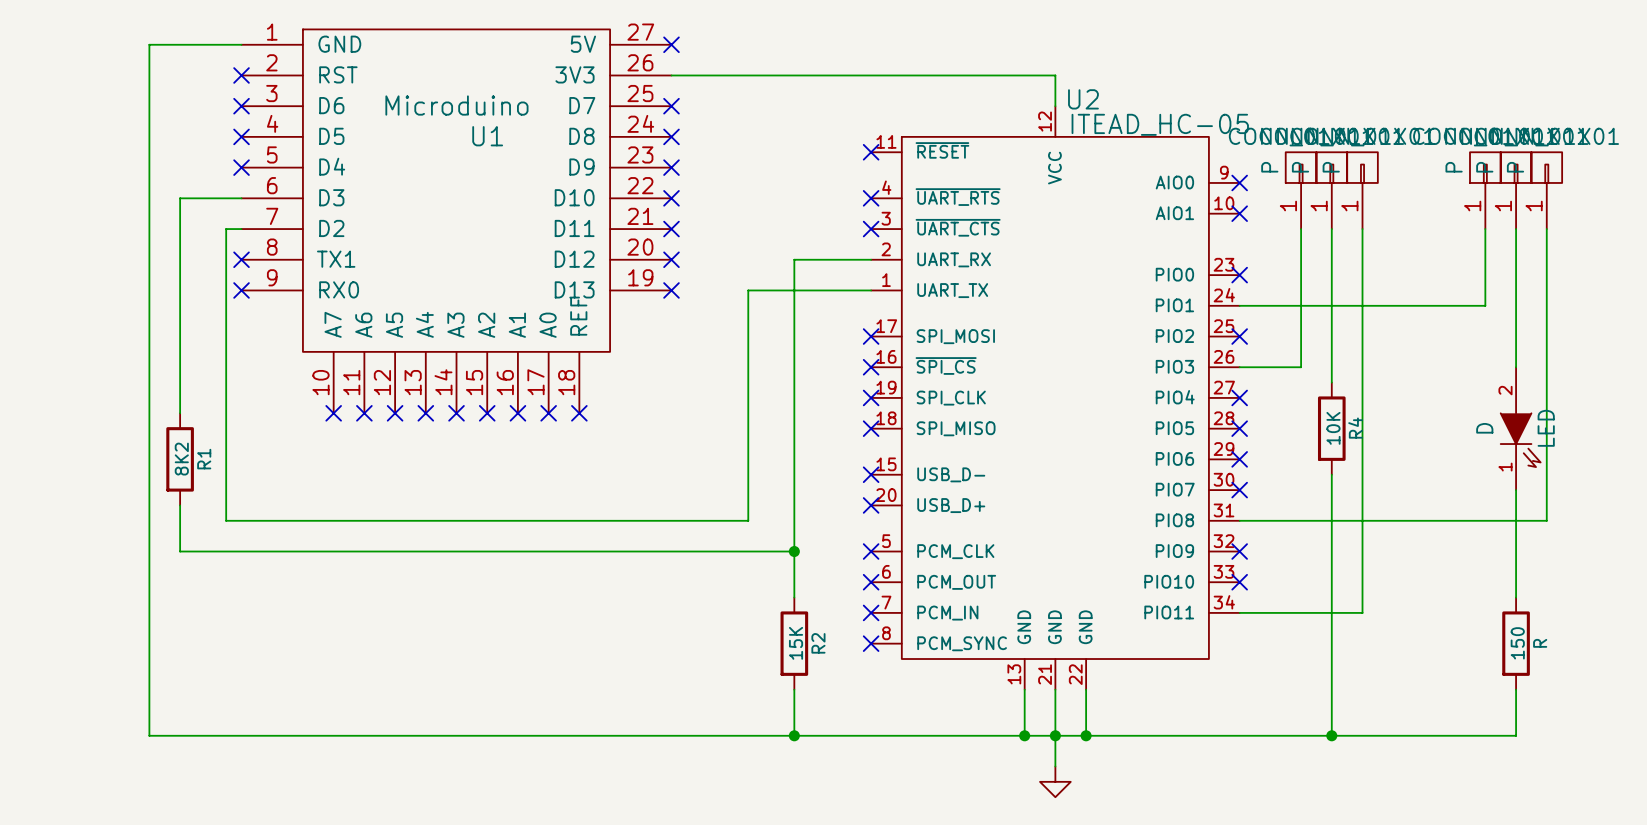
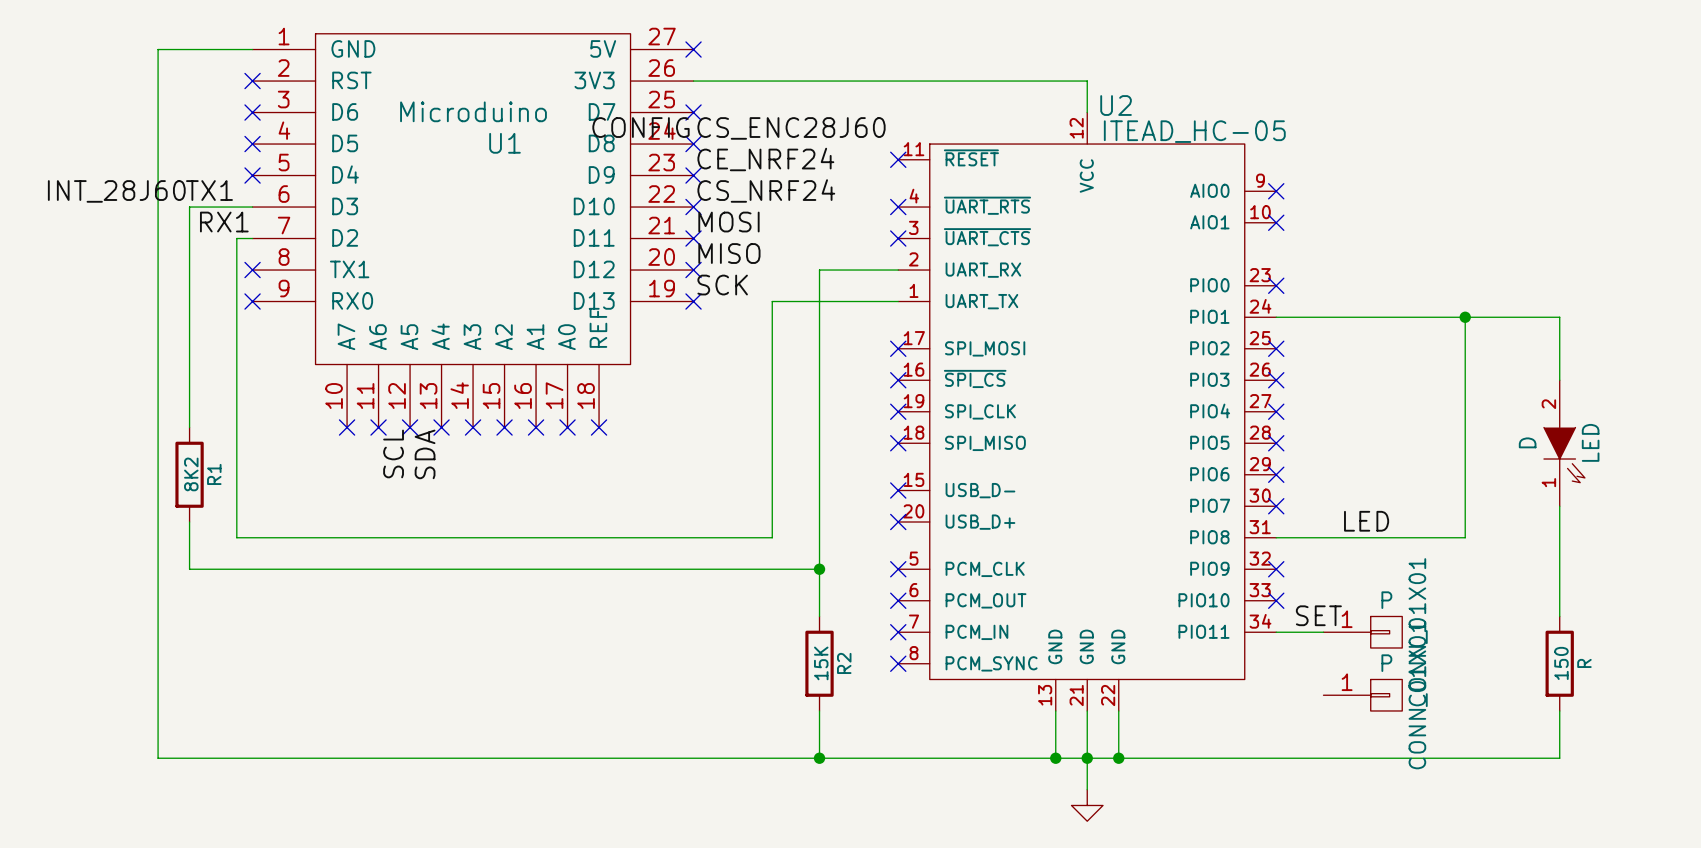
label: none -> CONFIG (640, 127)
label: none -> CS_ENC28J60 (791, 128)
label: none -> CE_NRF24 (765, 159)
label: none -> TX1 (209, 190)
label: none -> CS_NRF24 (766, 190)
label: none -> INT_28J60 (116, 191)
part: (1301, 190) -> none
part: (1331, 190) -> none
part: (1362, 190) -> none
part: (1485, 190) -> none
part: (1516, 190) -> none
part: (1546, 190) -> none
label: none -> RX1 (224, 222)
label: none -> MOSI (728, 222)
wire: (1301, 229) (1301, 367) (1239, 367) -> none
wire: (1331, 229) (1331, 382) -> none
wire: (1362, 229) (1362, 612) (1285, 612) -> none
wire: (1485, 229) (1485, 305) -> (1559, 317) (1528, 317)
wire: (1516, 229) (1516, 305) -> none
wire: (1546, 229) (1546, 520) (1423, 520) -> (1465, 317) (1465, 537)
label: none -> MISO (729, 253)
label: none -> SCK (722, 285)
junction: none -> (1465, 317)
no-connect mark: none -> (1276, 380)
R4: 10K (1331, 428) -> none
label: none -> SCL (393, 453)
label: none -> SDA (425, 454)
wire: (1331, 474) (1331, 735) -> none
label: none -> LED (1366, 521)
label: none -> SET (1318, 615)
part: none -> (1362, 632)
part: none -> (1362, 695)
junction: (1331, 735) -> none

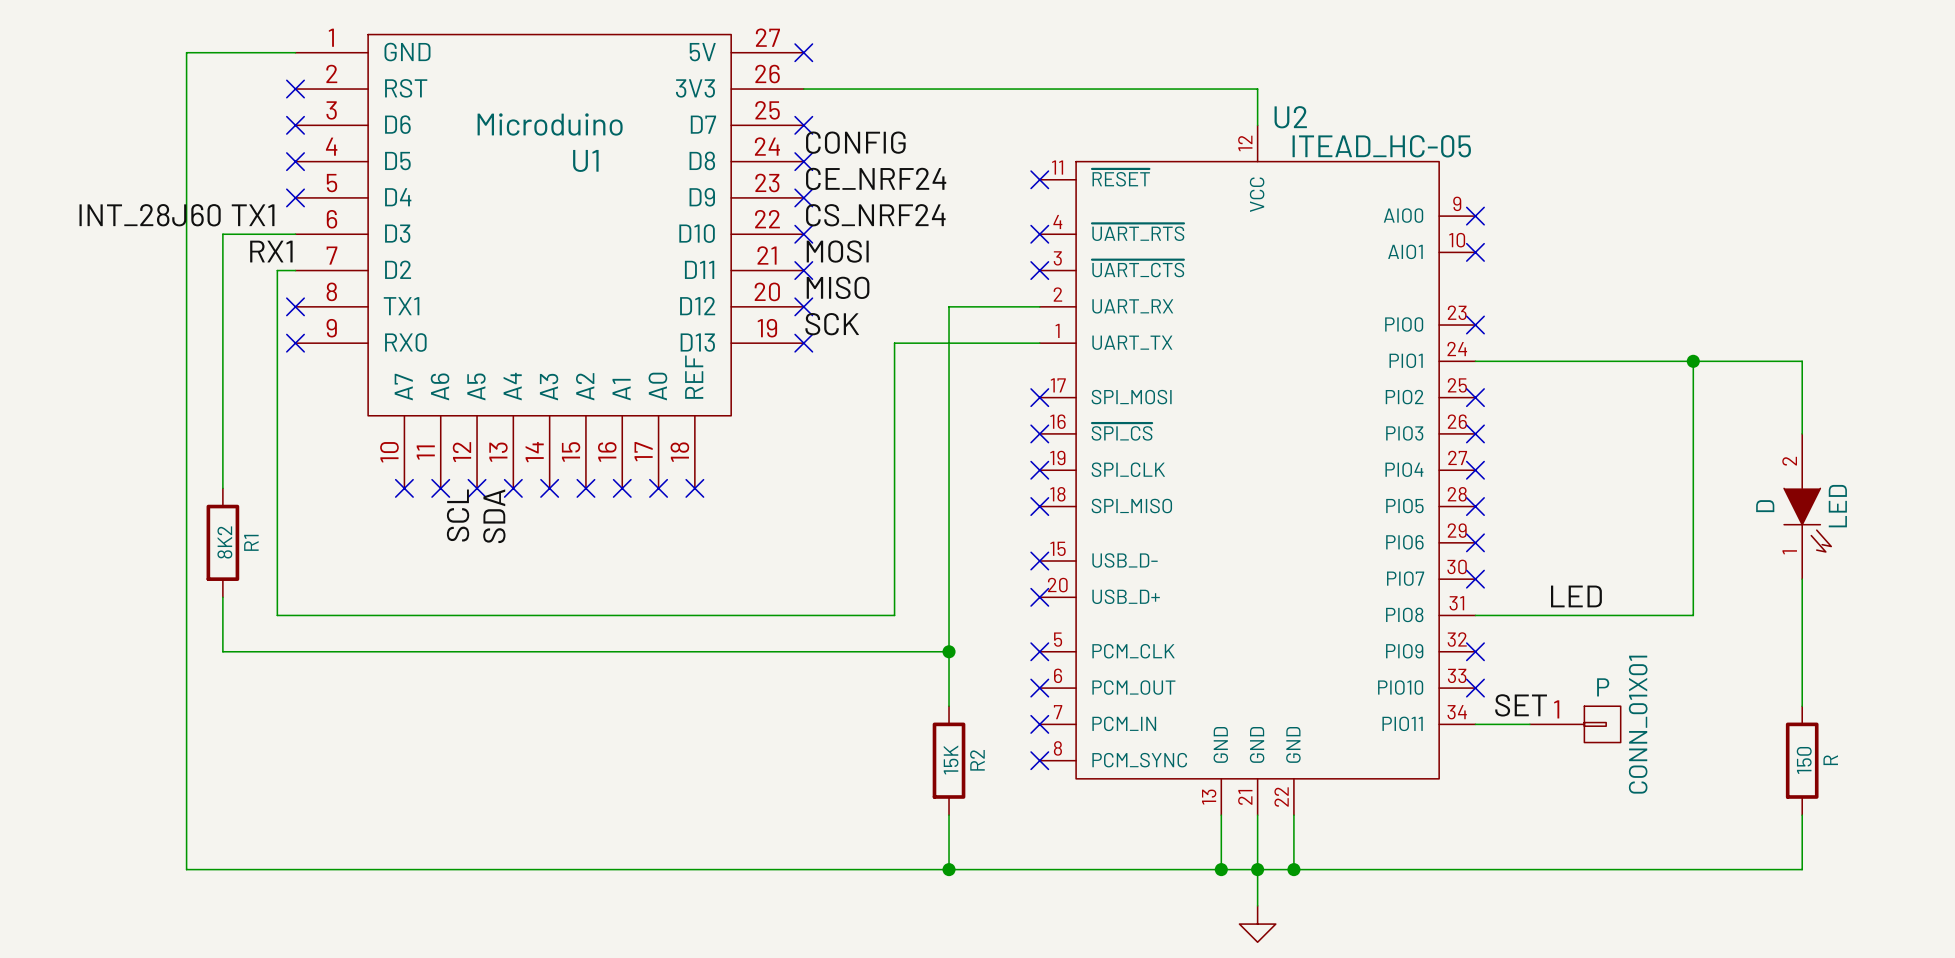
label position: CONFIG (640, 127) -> CONFIG (855, 142)
label: CS_ENC28J60 (791, 128) -> none
part: (1362, 695) -> none

